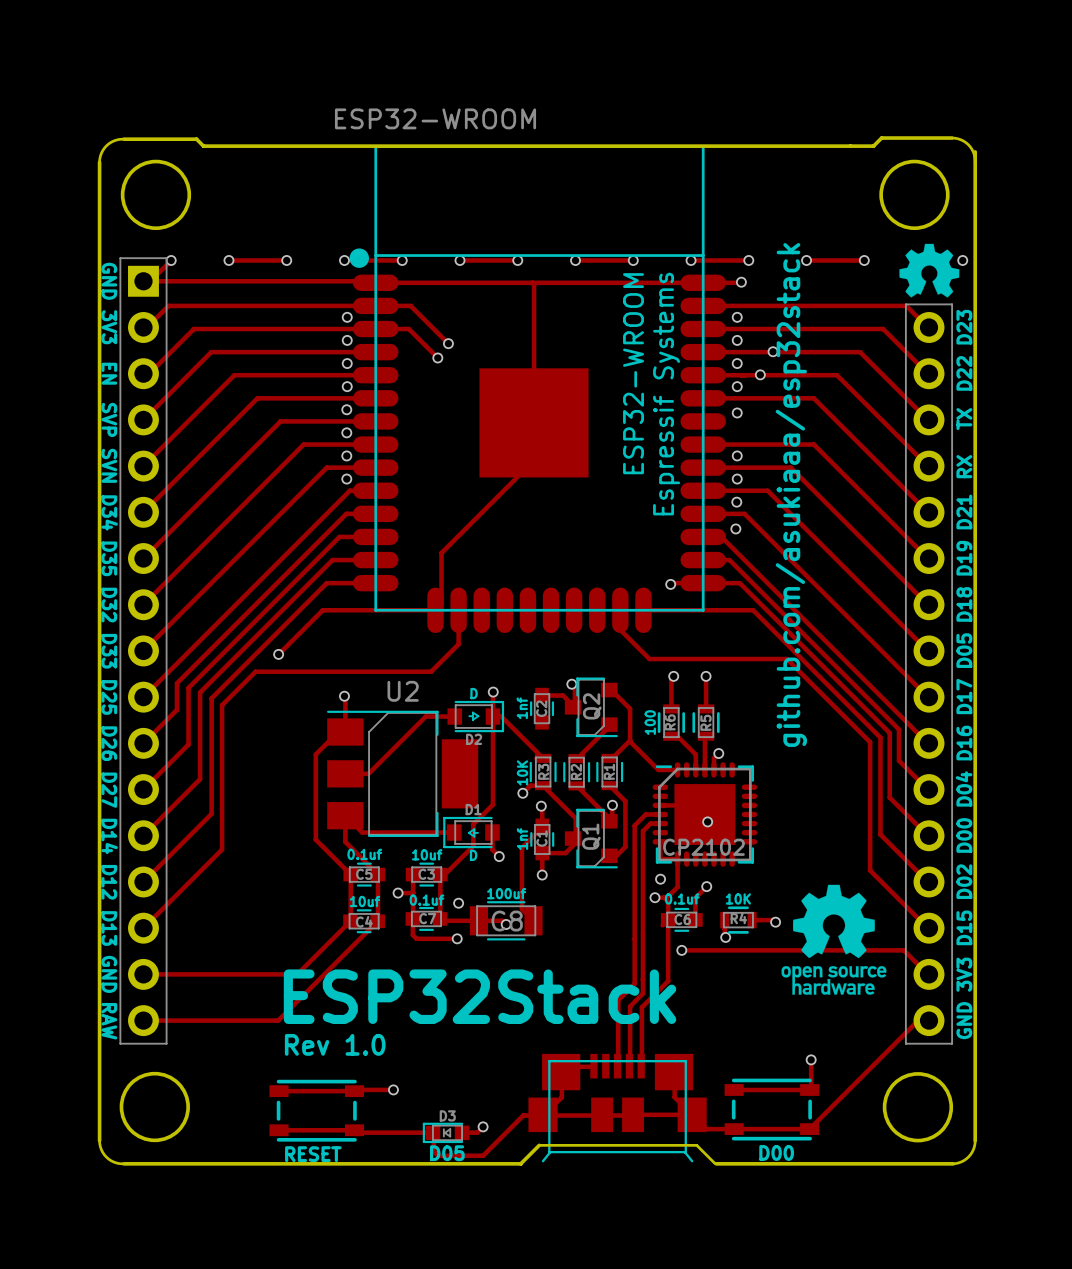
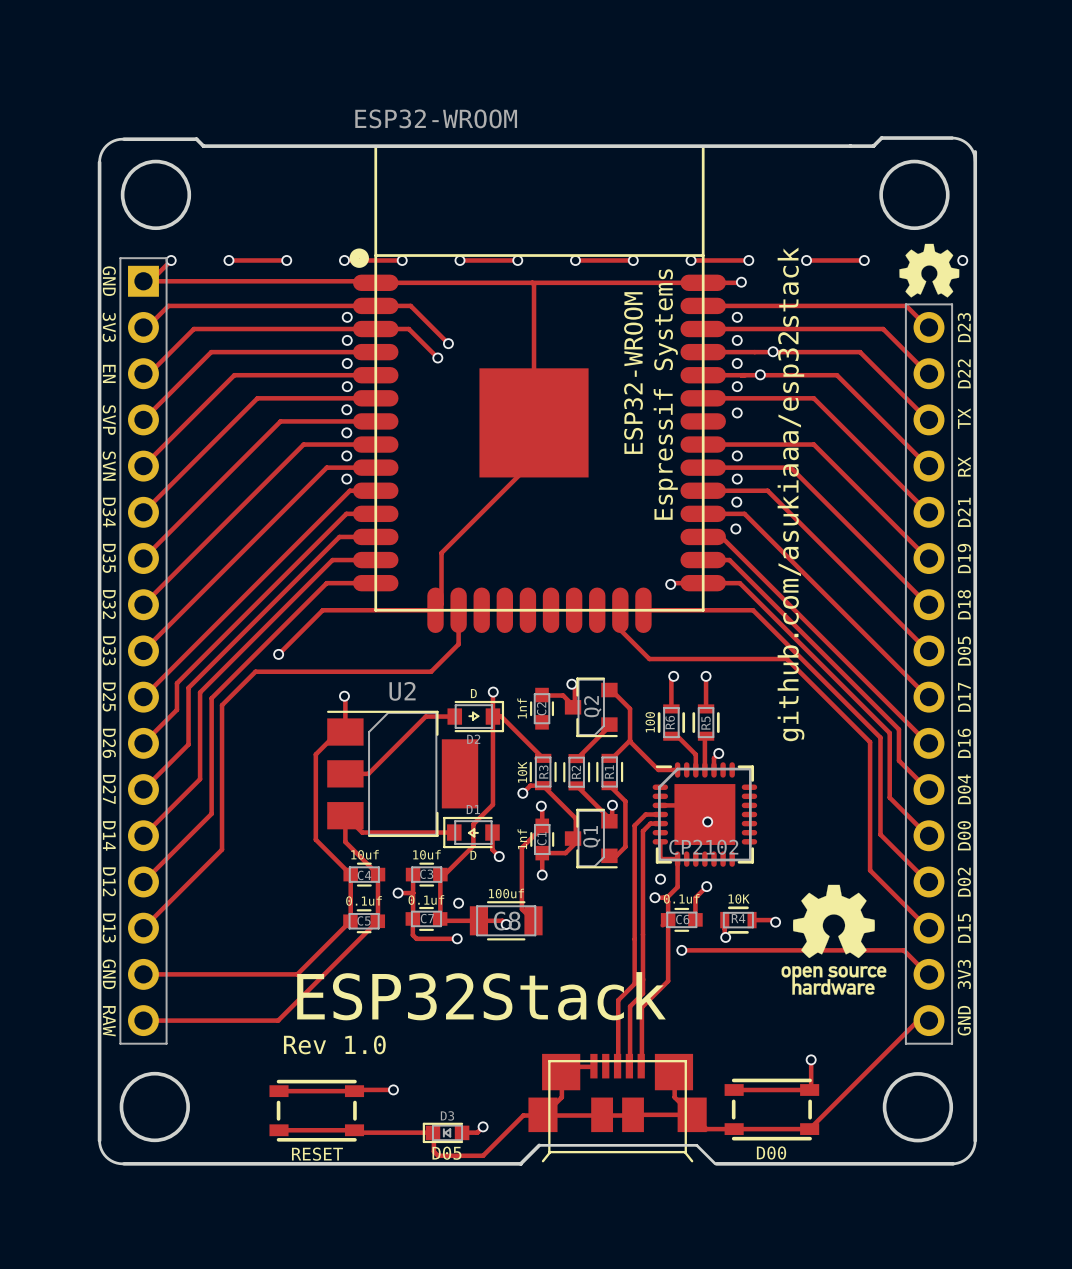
C5 value: 0.1uf (364, 854) -> 10uf (365, 854)
C5 name: C5 (364, 874) -> C4 (364, 875)
C4 value: 10uf (365, 901) -> 0.1uf (364, 900)
C4 name: C4 (364, 921) -> C5 (364, 920)

